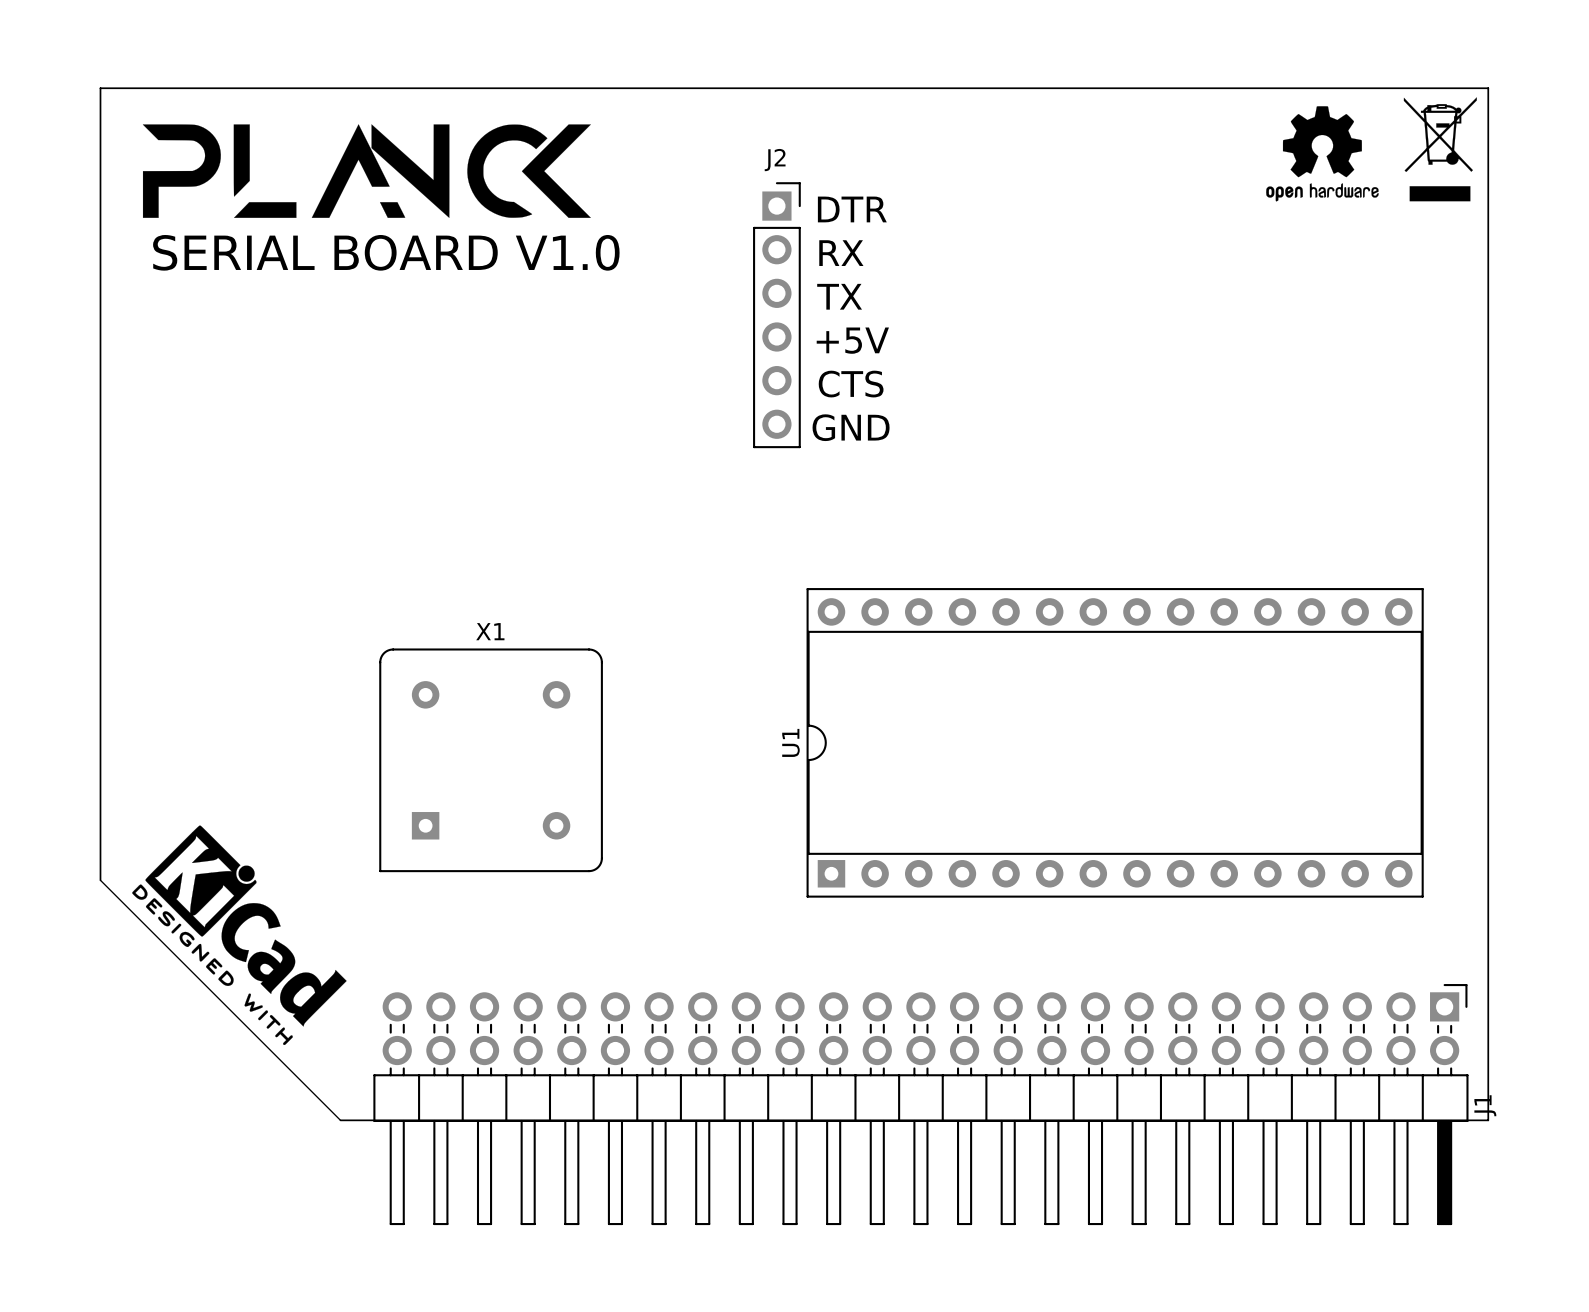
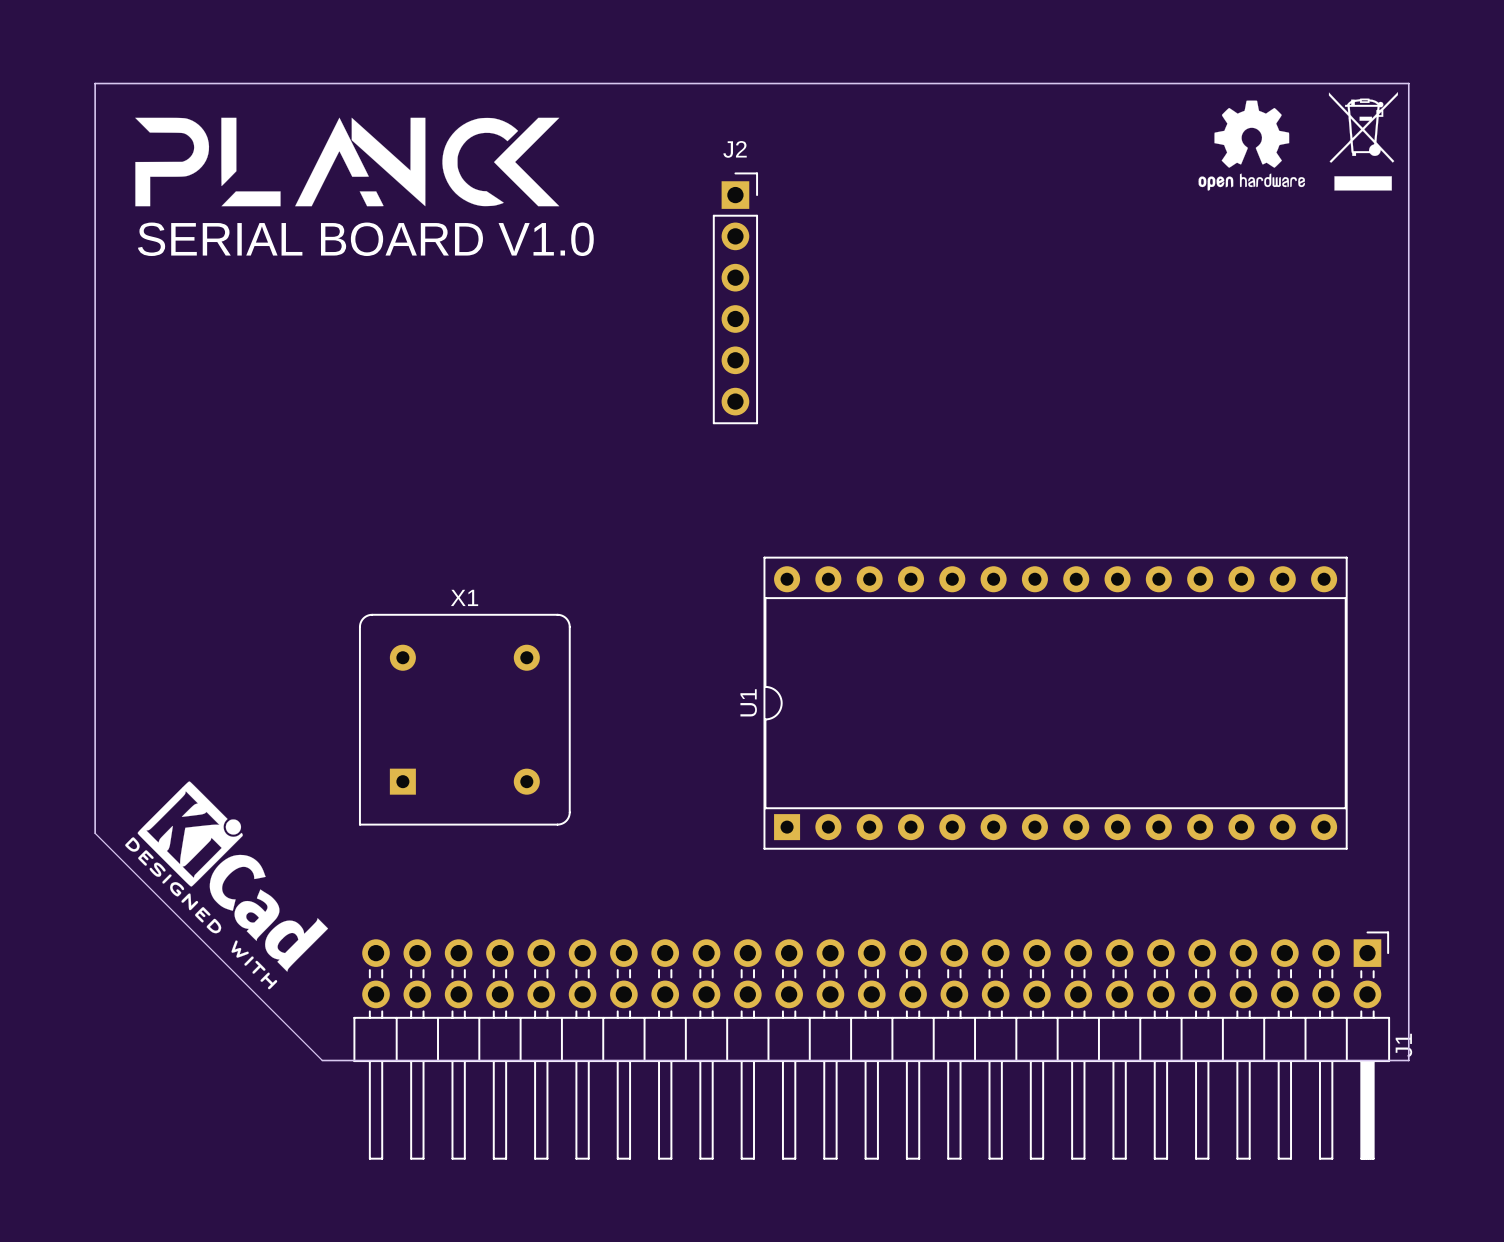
text: DTR (852, 209) -> none
text: RX (841, 253) -> none
text: TX (839, 296) -> none
text: +5V (852, 340) -> none
text: CTS (851, 384) -> none
text: GND (851, 427) -> none

